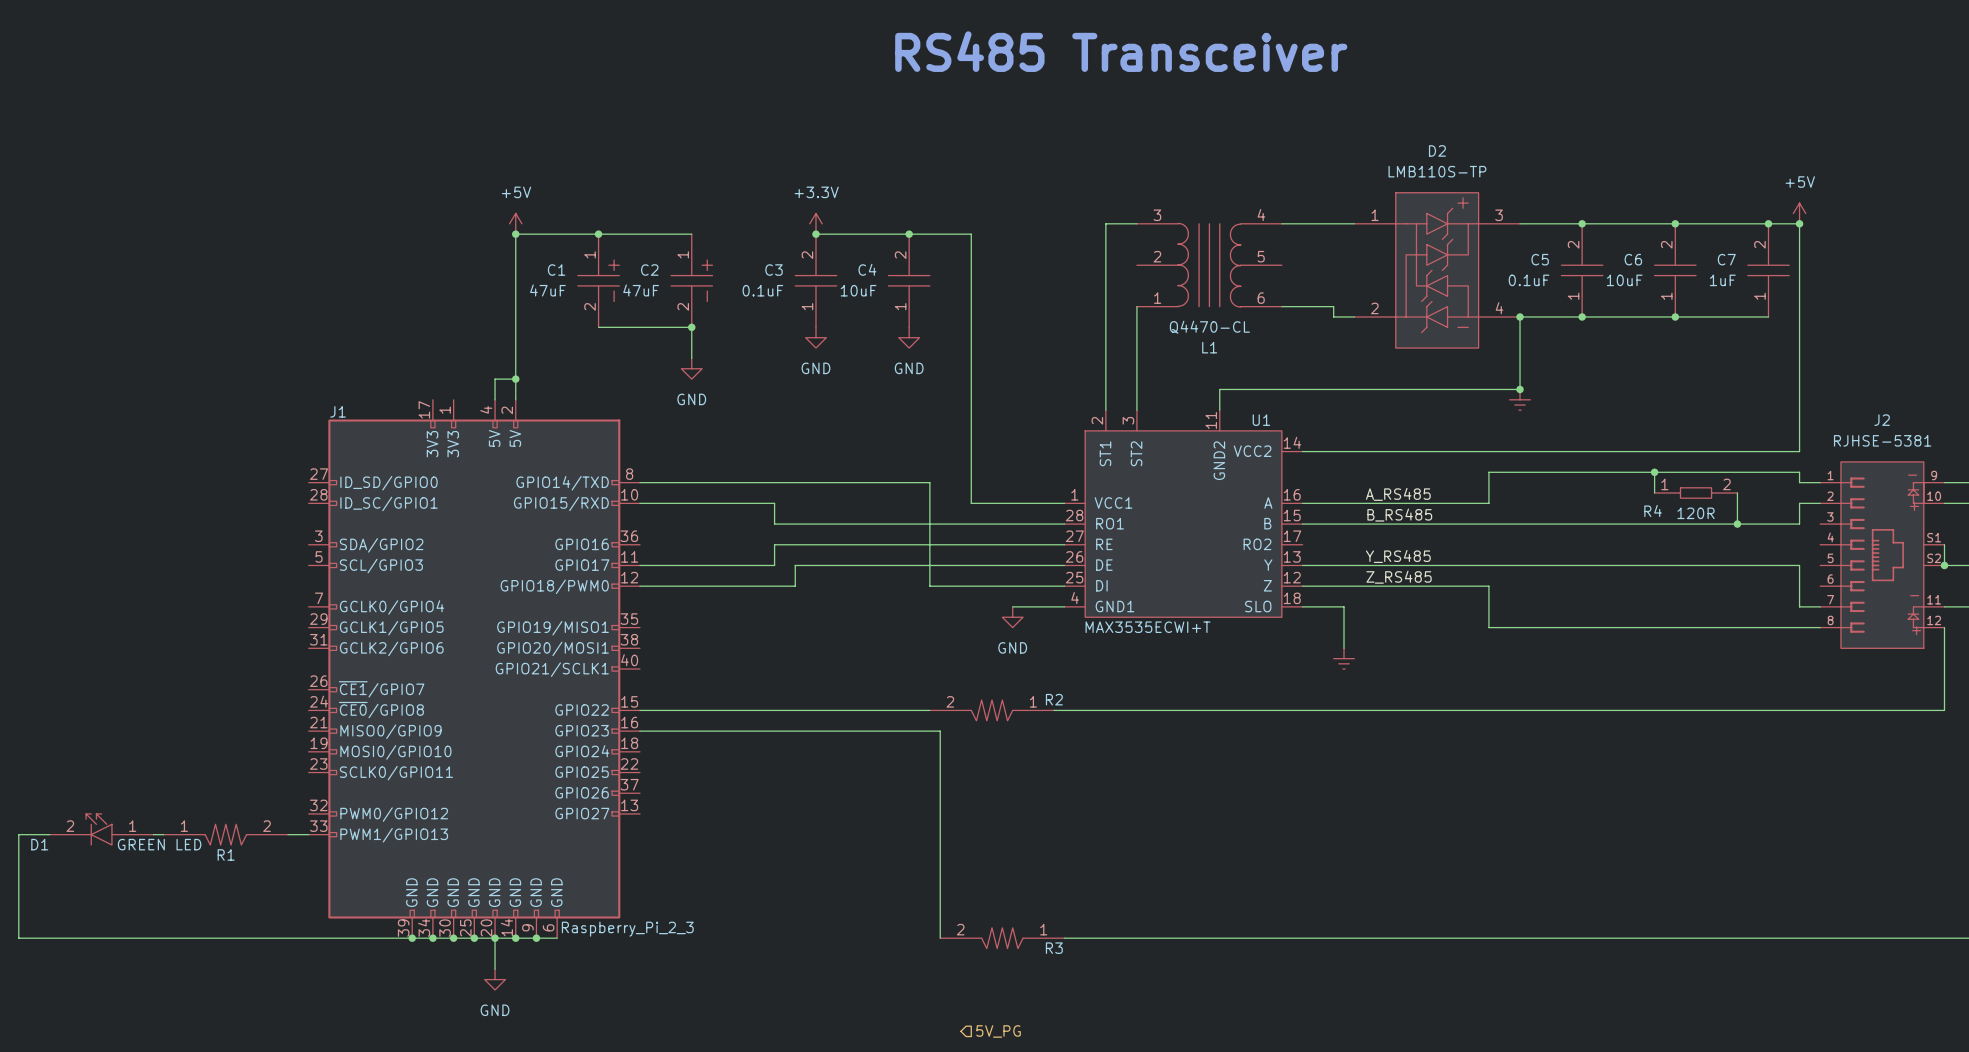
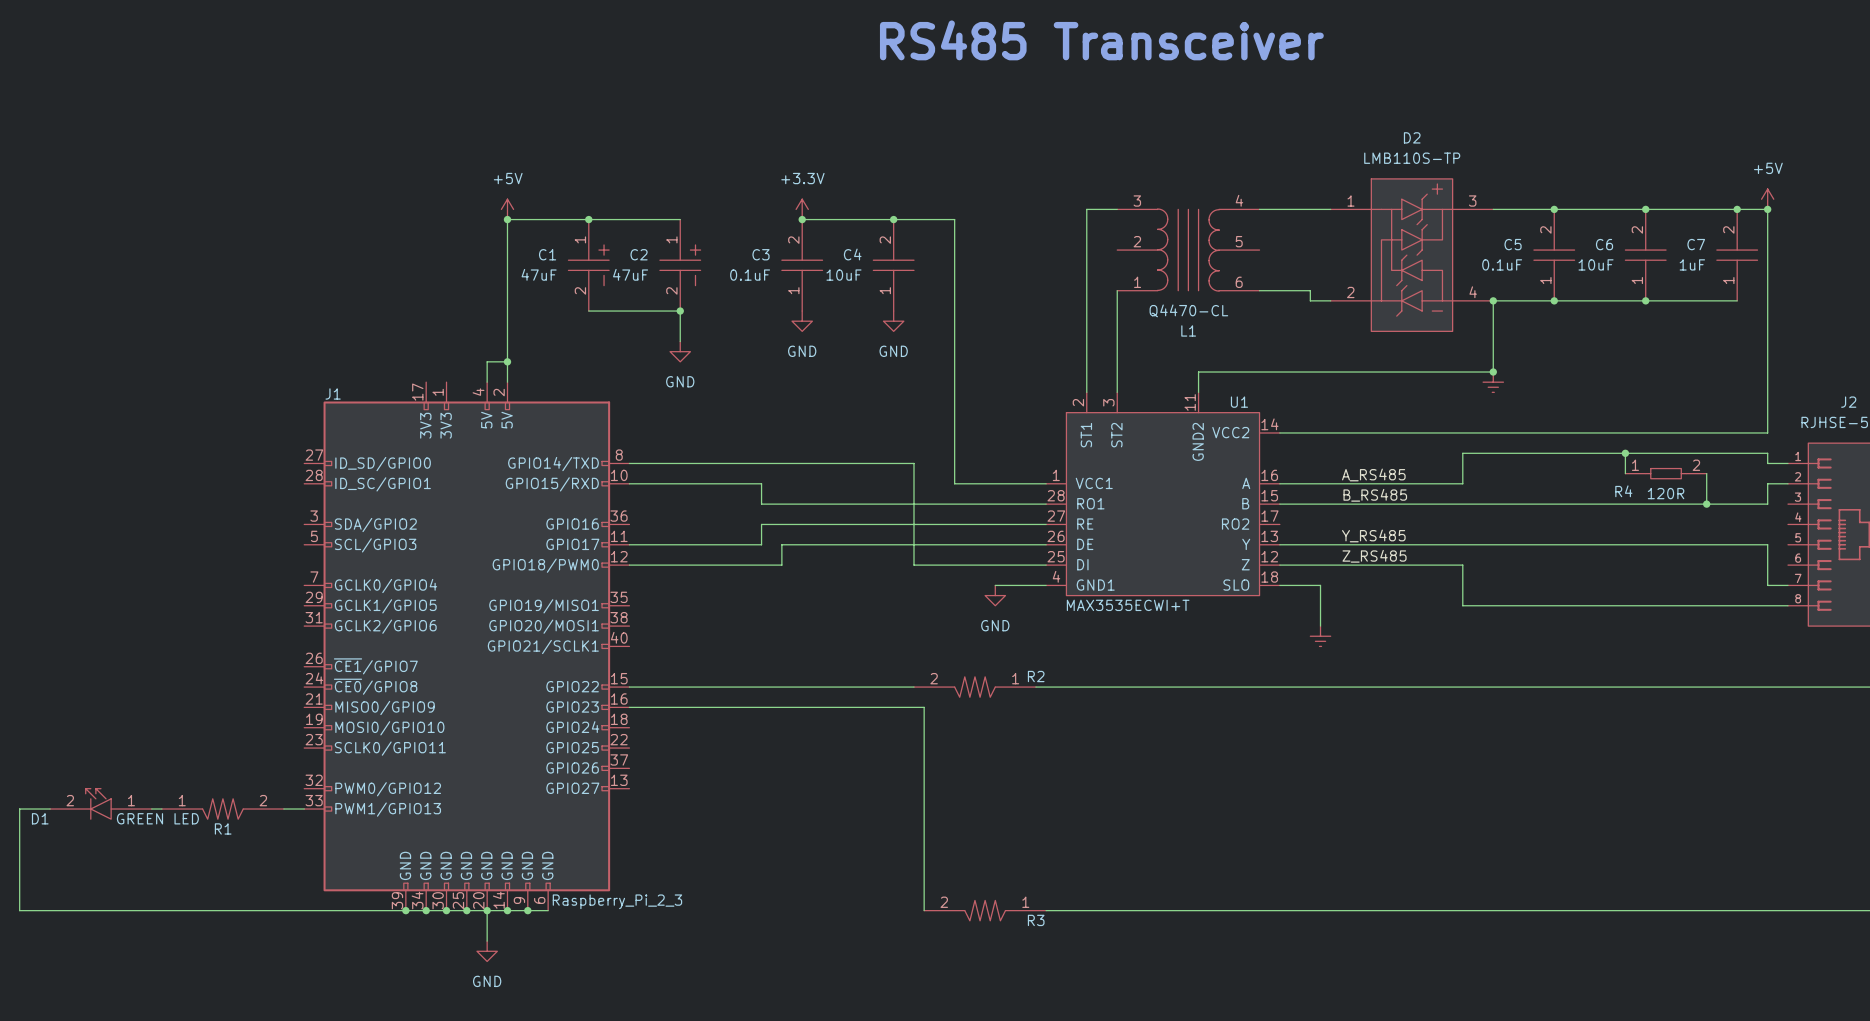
hierarchical label: 5V_PG (998, 1031) -> none

